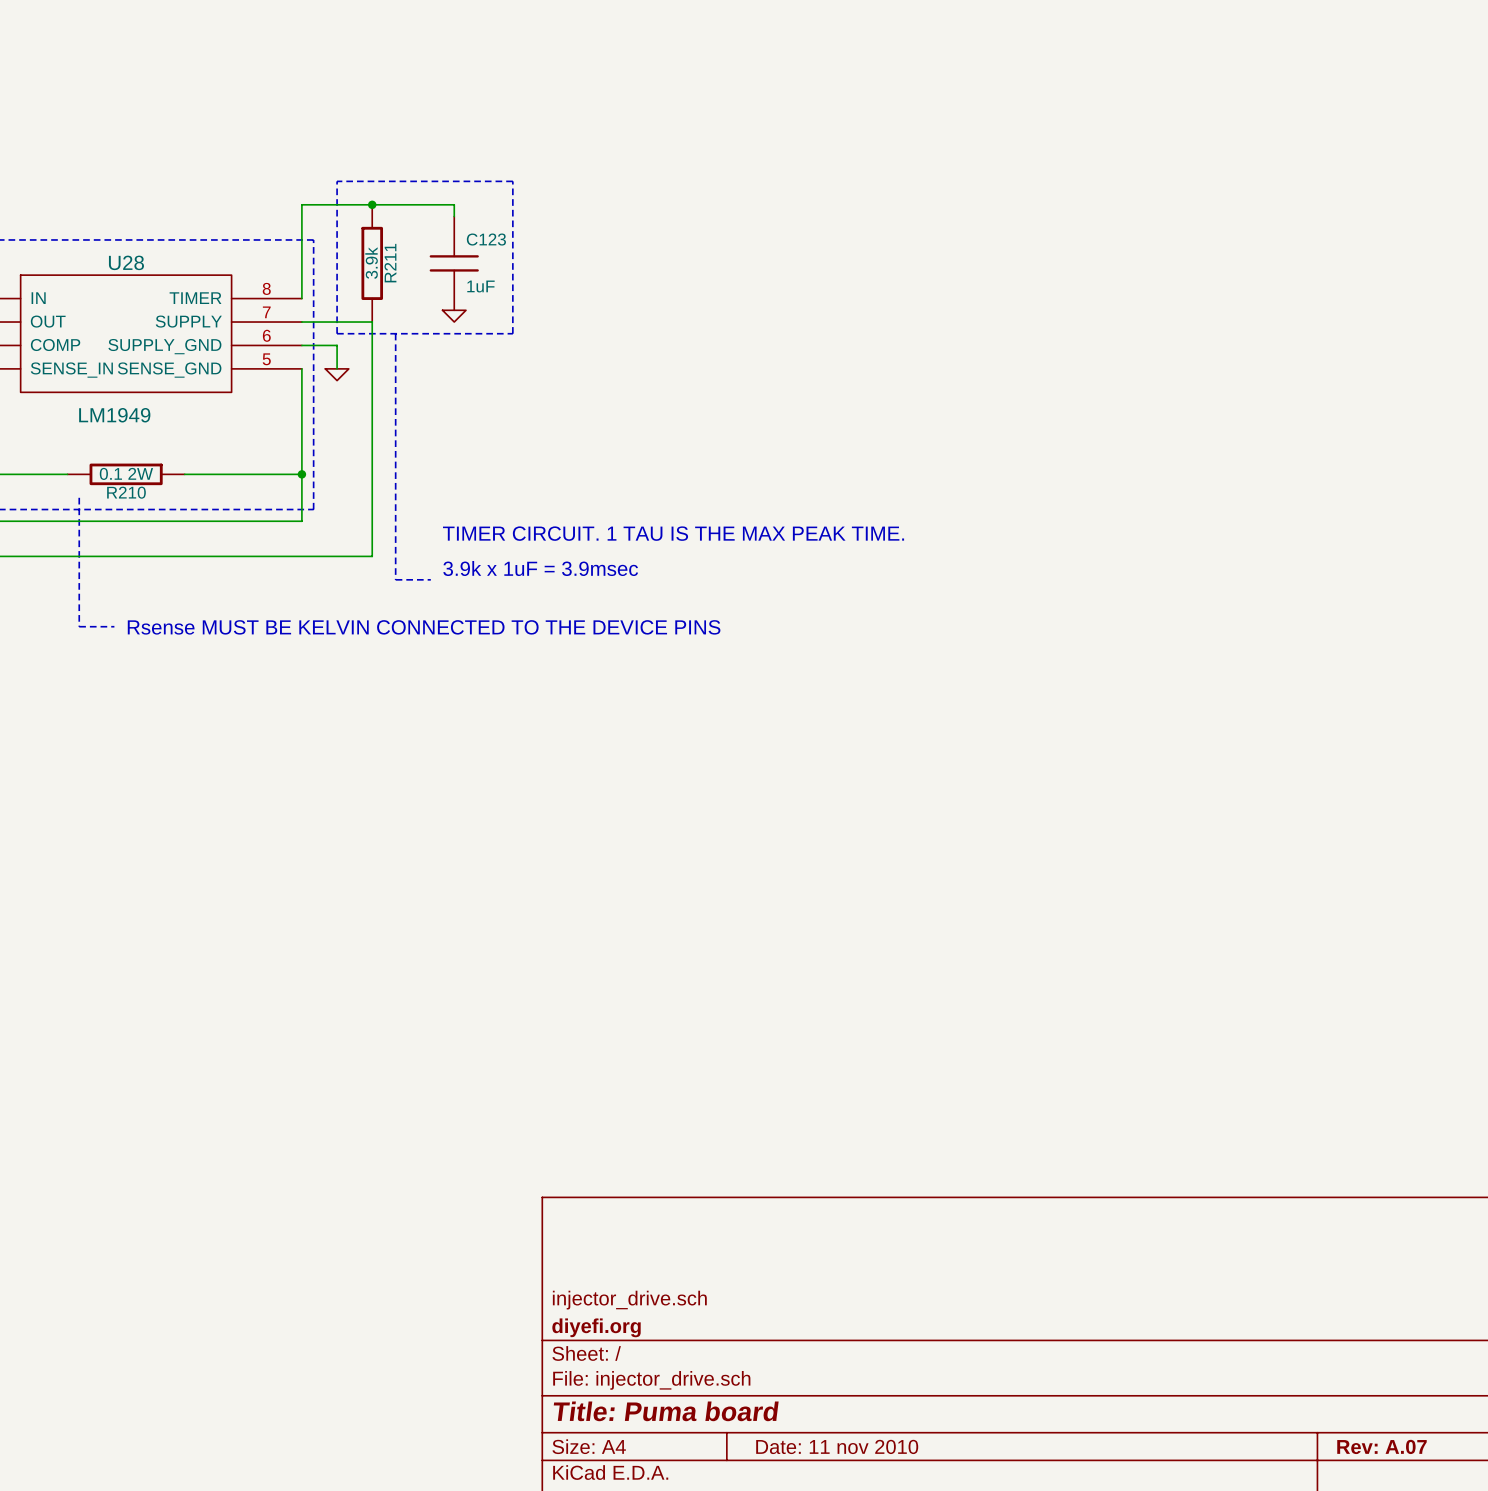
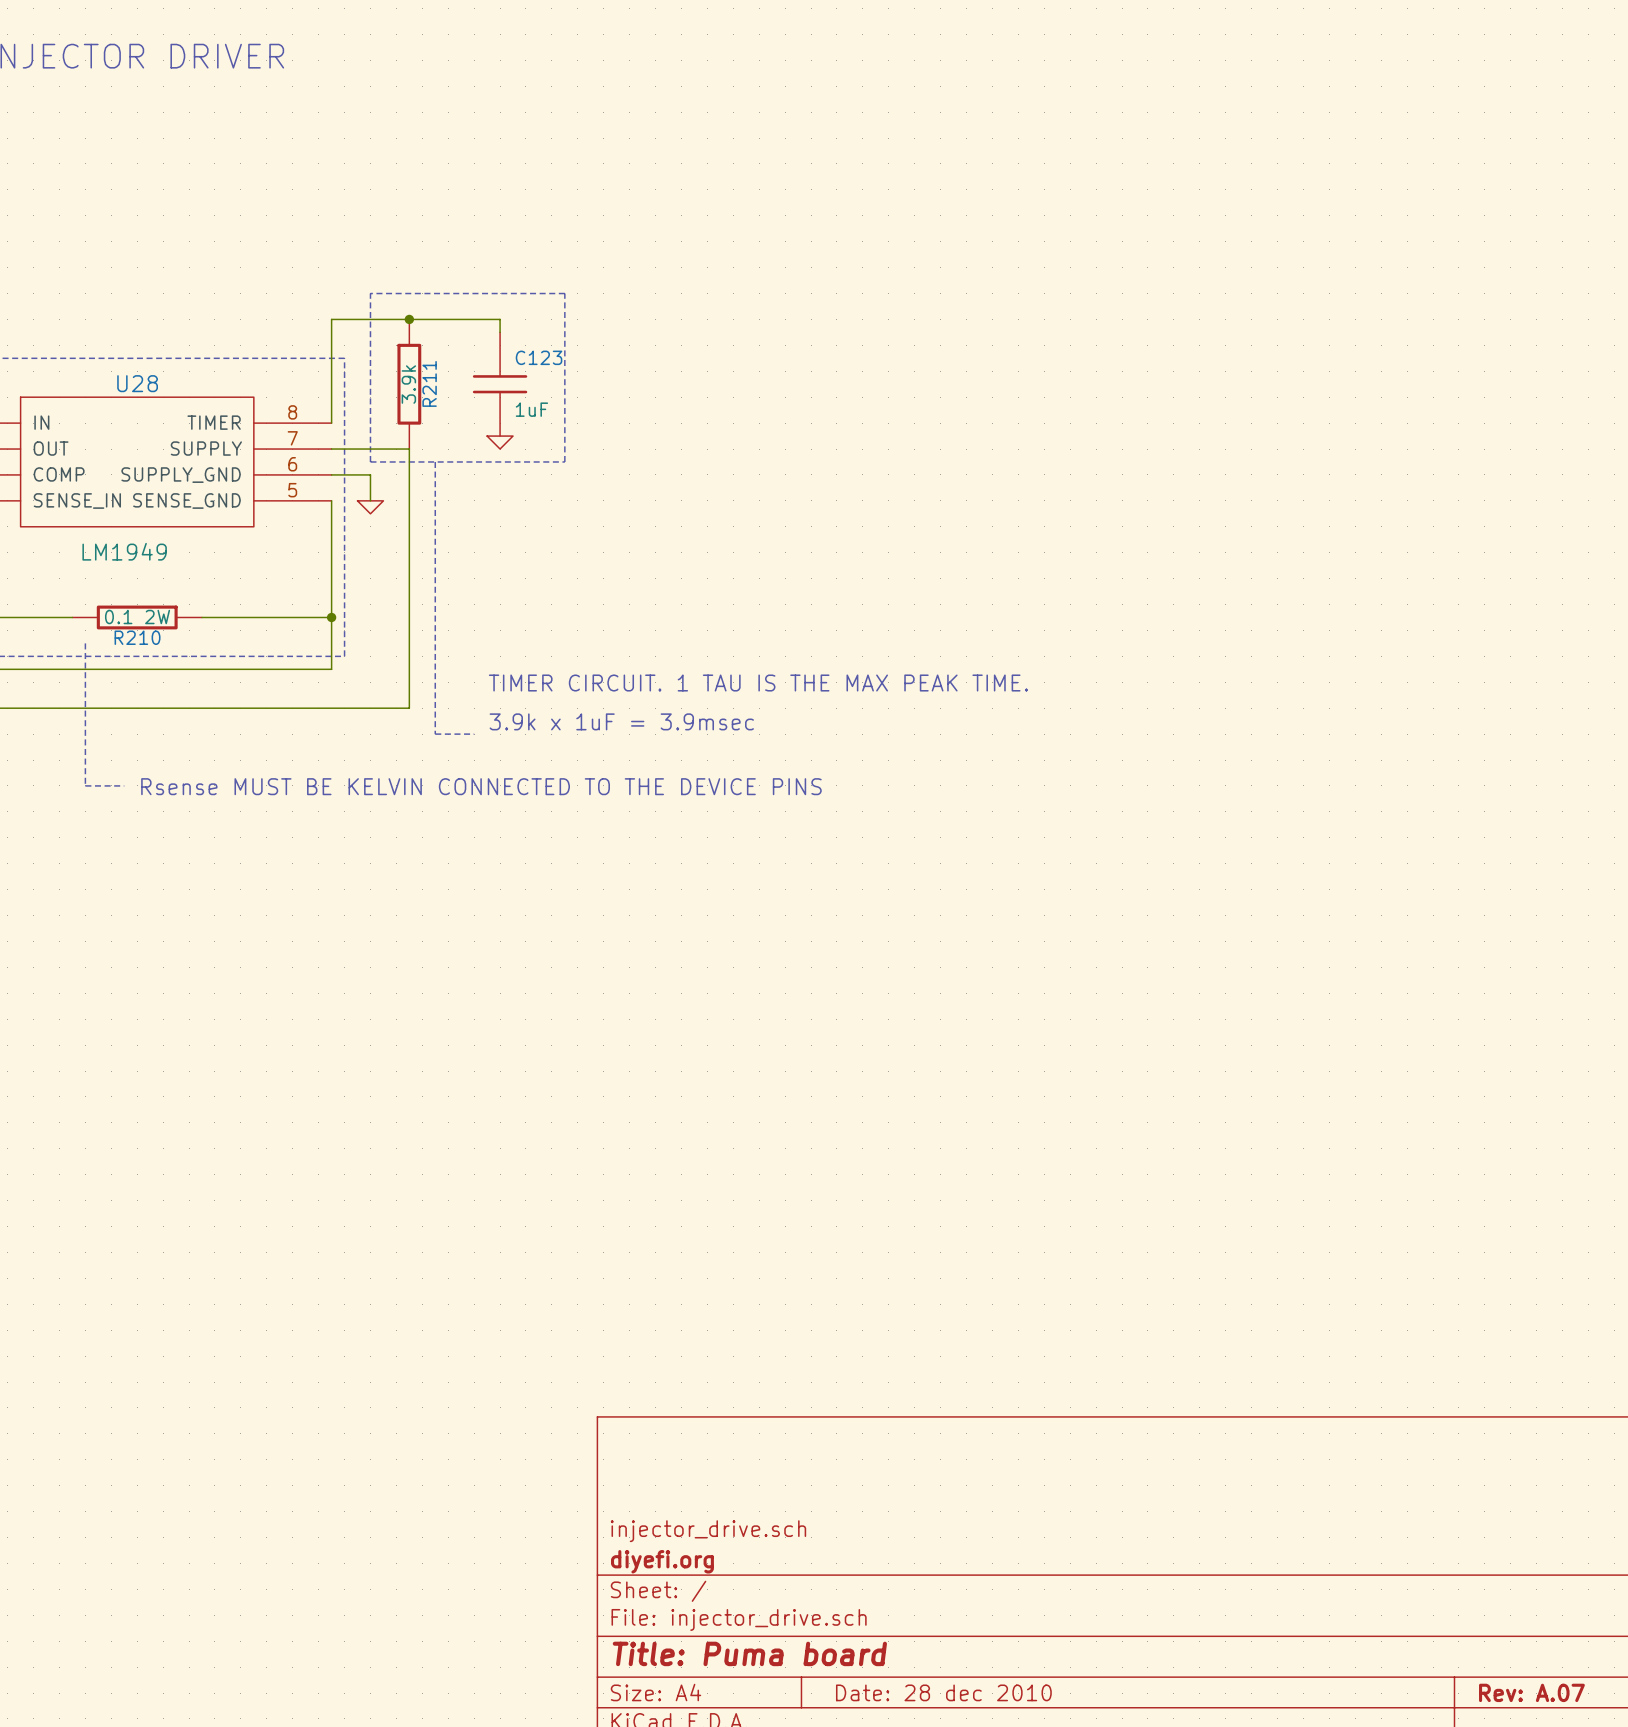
title block: Date: 11 nov 2010 (837, 1446) -> Date: 28 dec 2010 (943, 1692)

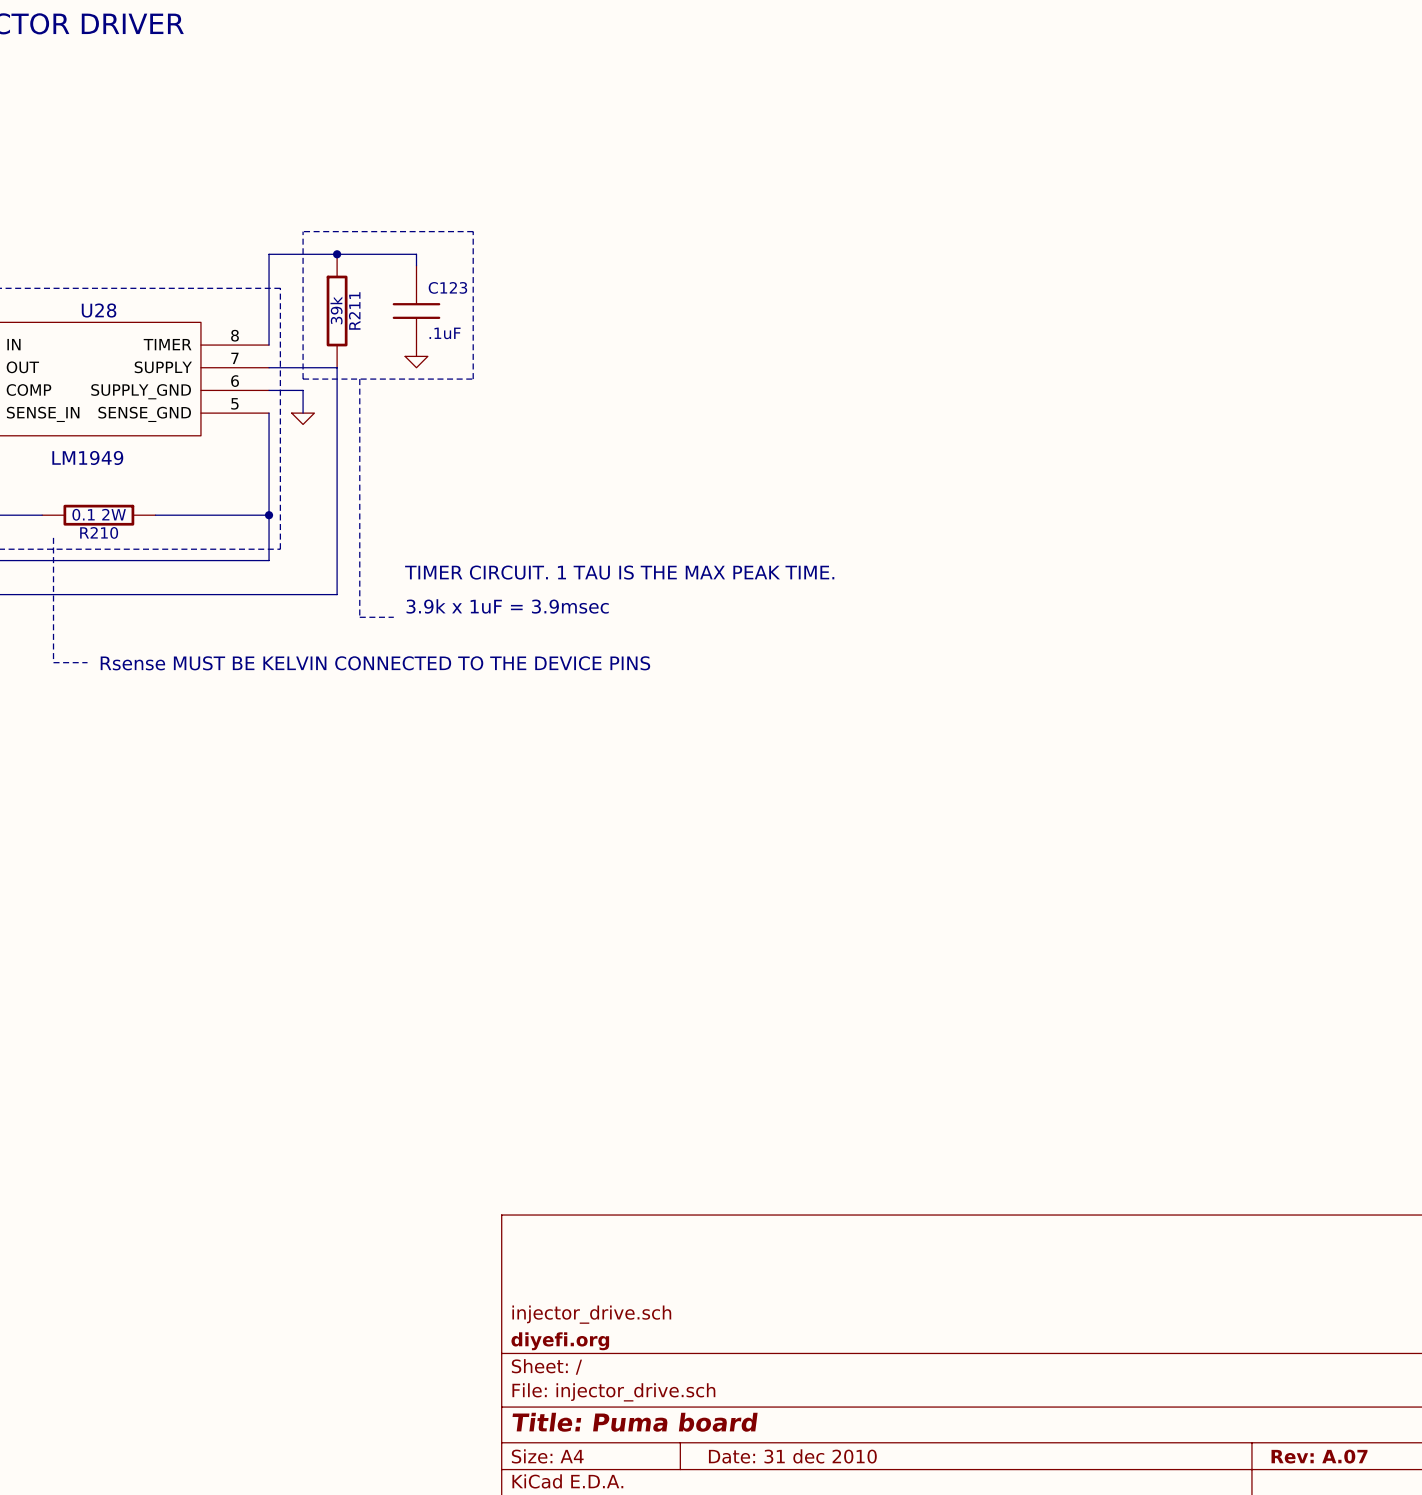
R211 value: 3.9k (408, 384) -> 39k (336, 310)
C123 value: 1uF (531, 409) -> .1uF (445, 333)
title block: Date: 28 dec 2010 (943, 1692) -> Date: 31 dec 2010 (792, 1456)

